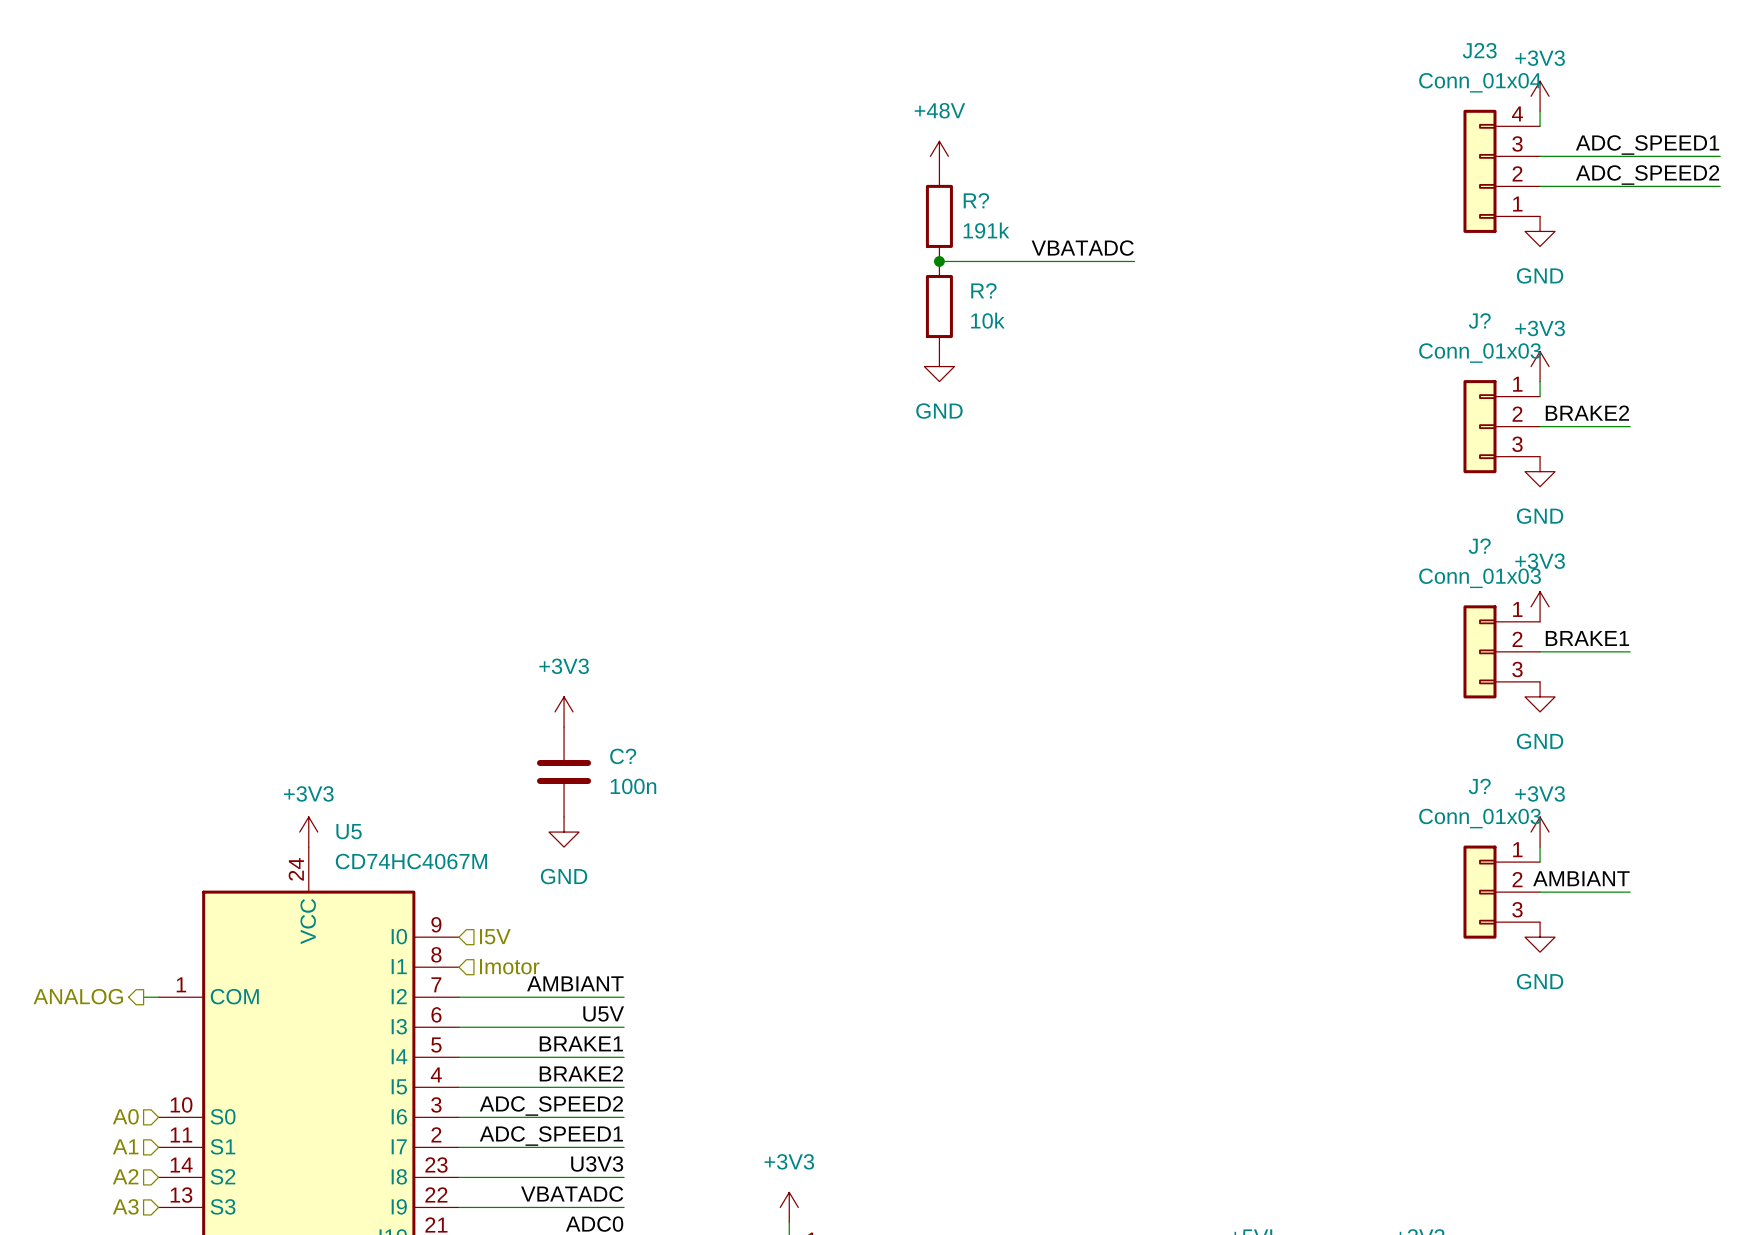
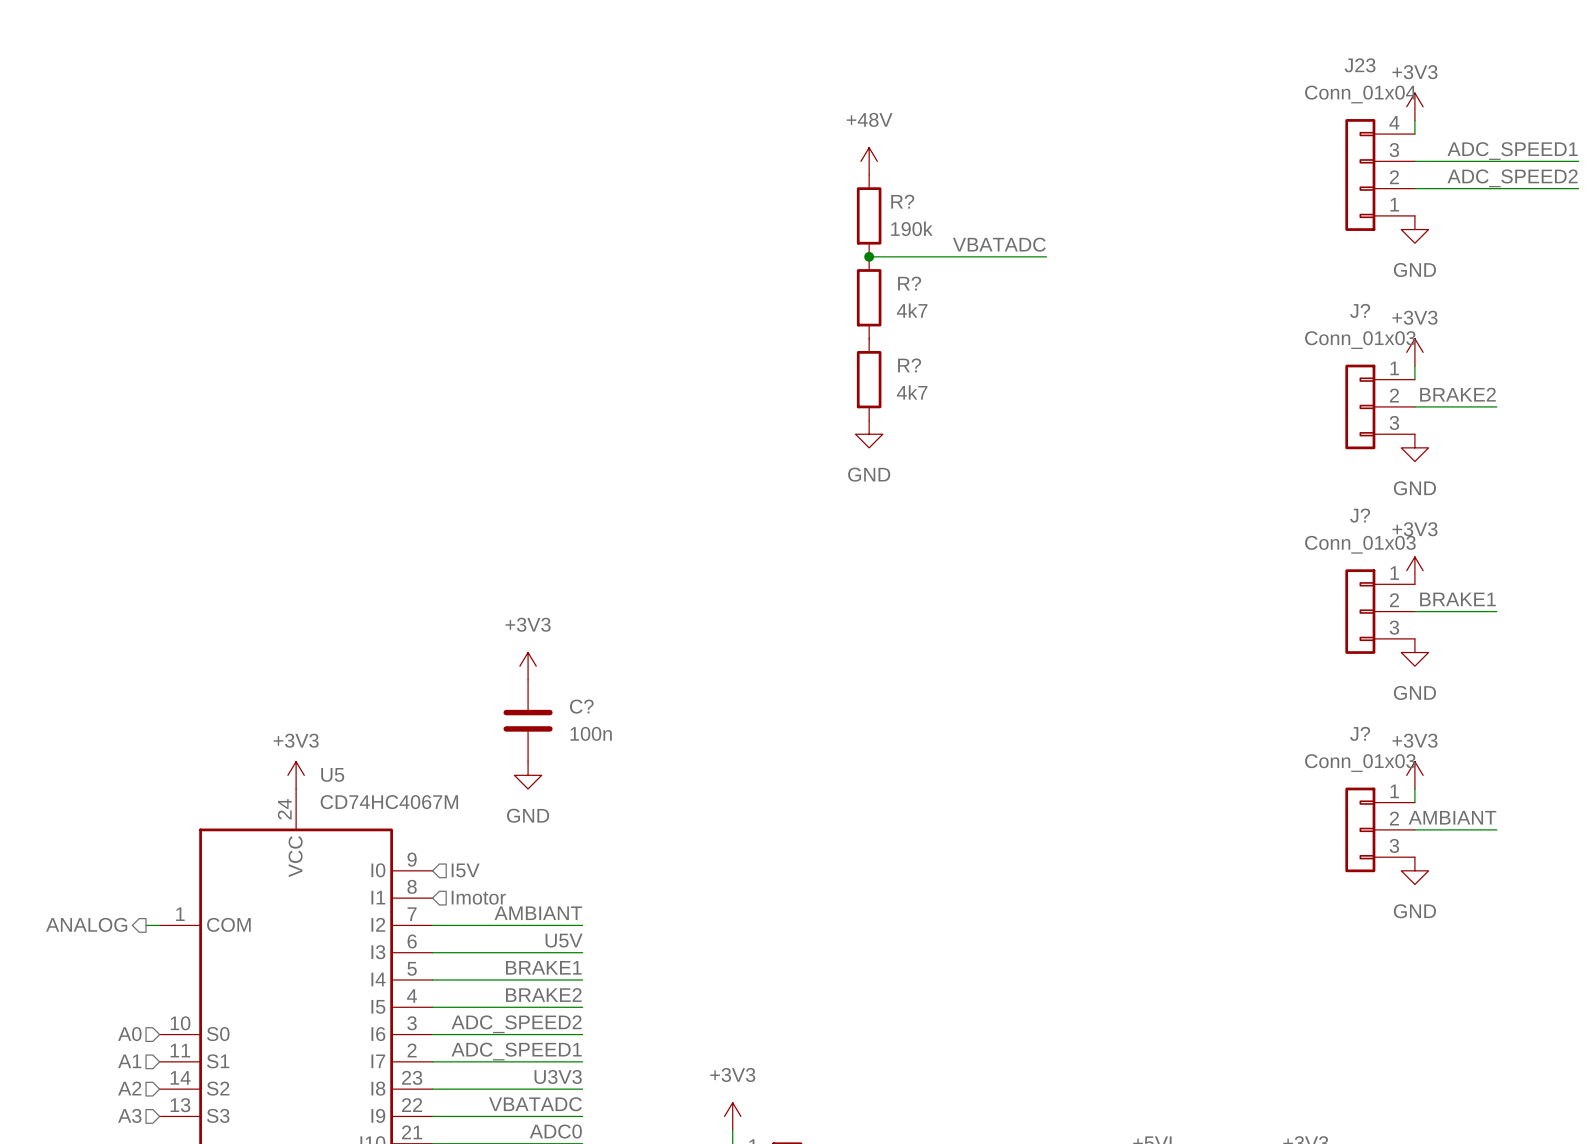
R? value: 191k (986, 230) -> 190k (911, 228)
R? value: 10k (987, 320) -> 4k7 (912, 310)
power symbol position: GND (939, 366) -> GND (869, 434)
R?: none -> 4k7 (869, 379)

